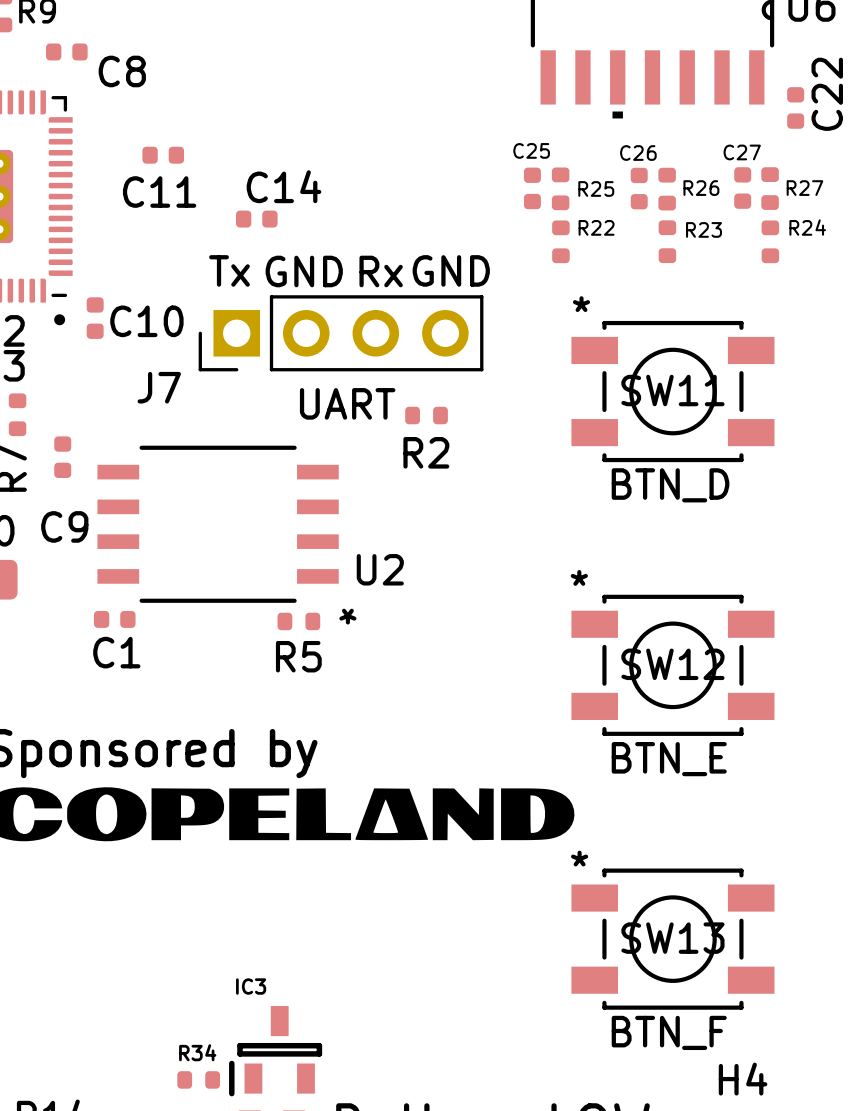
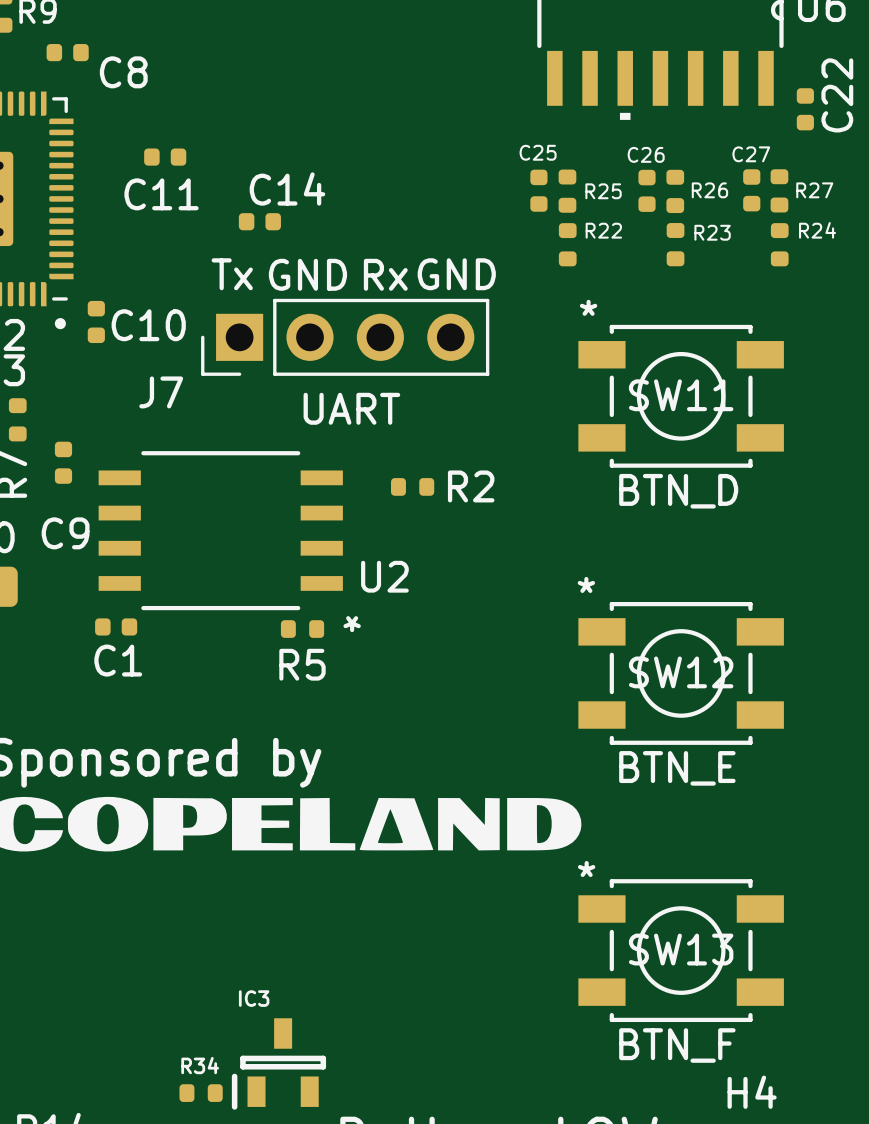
R2 position: (426, 415) -> (412, 486)
R2 name position: R2 (426, 452) -> R2 (471, 486)

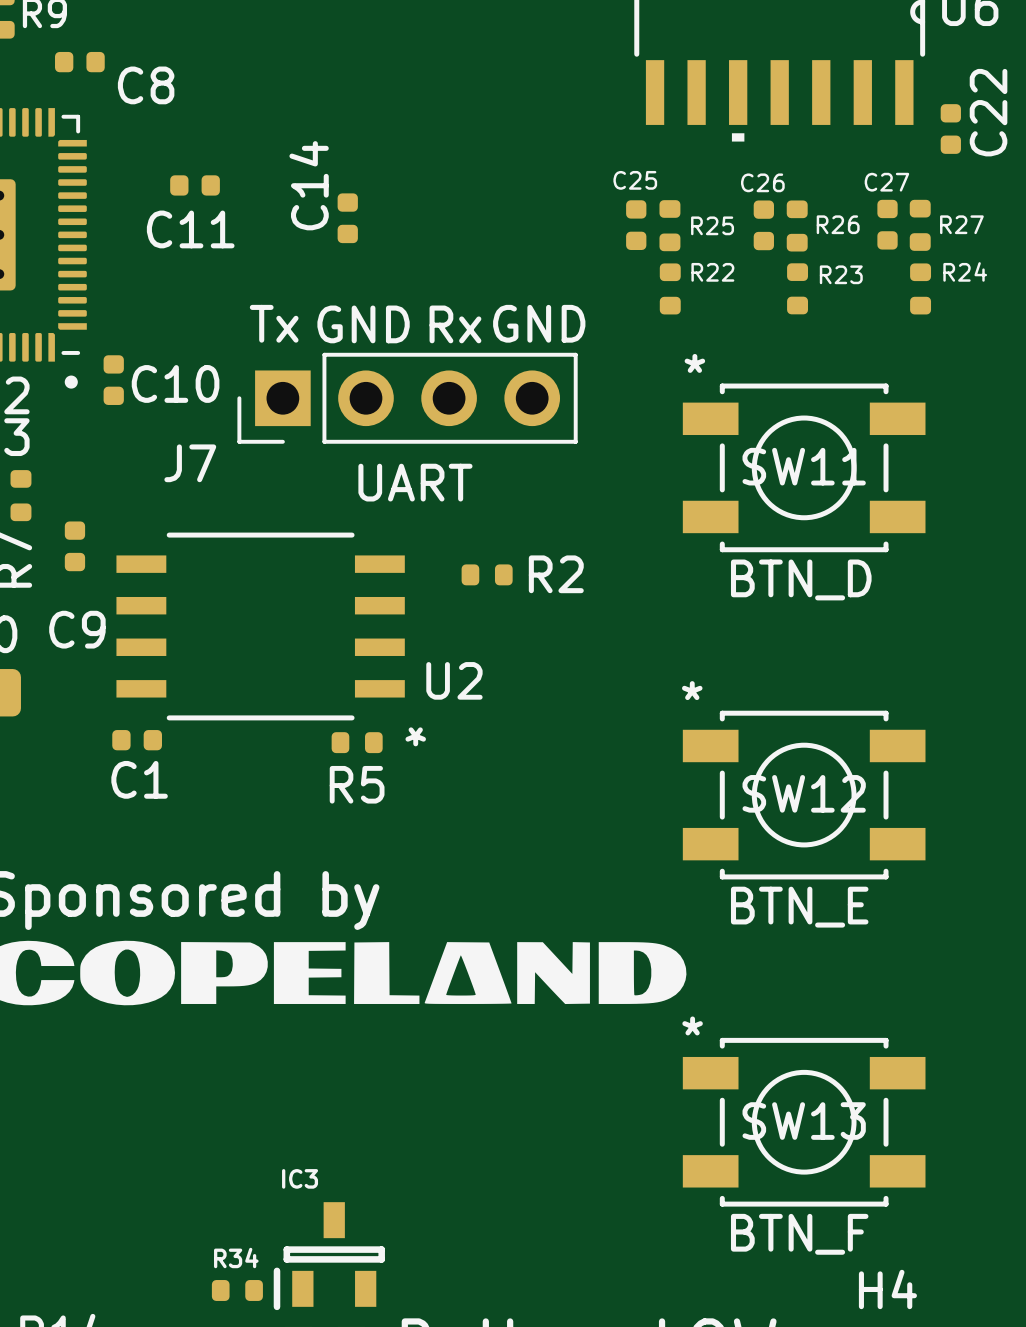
C14 name position: C14 (287, 188) -> C14 (309, 185)
C14 rotation: 0° (259, 221) -> 90° clockwise (347, 218)
C14 position: (259, 221) -> (347, 218)

